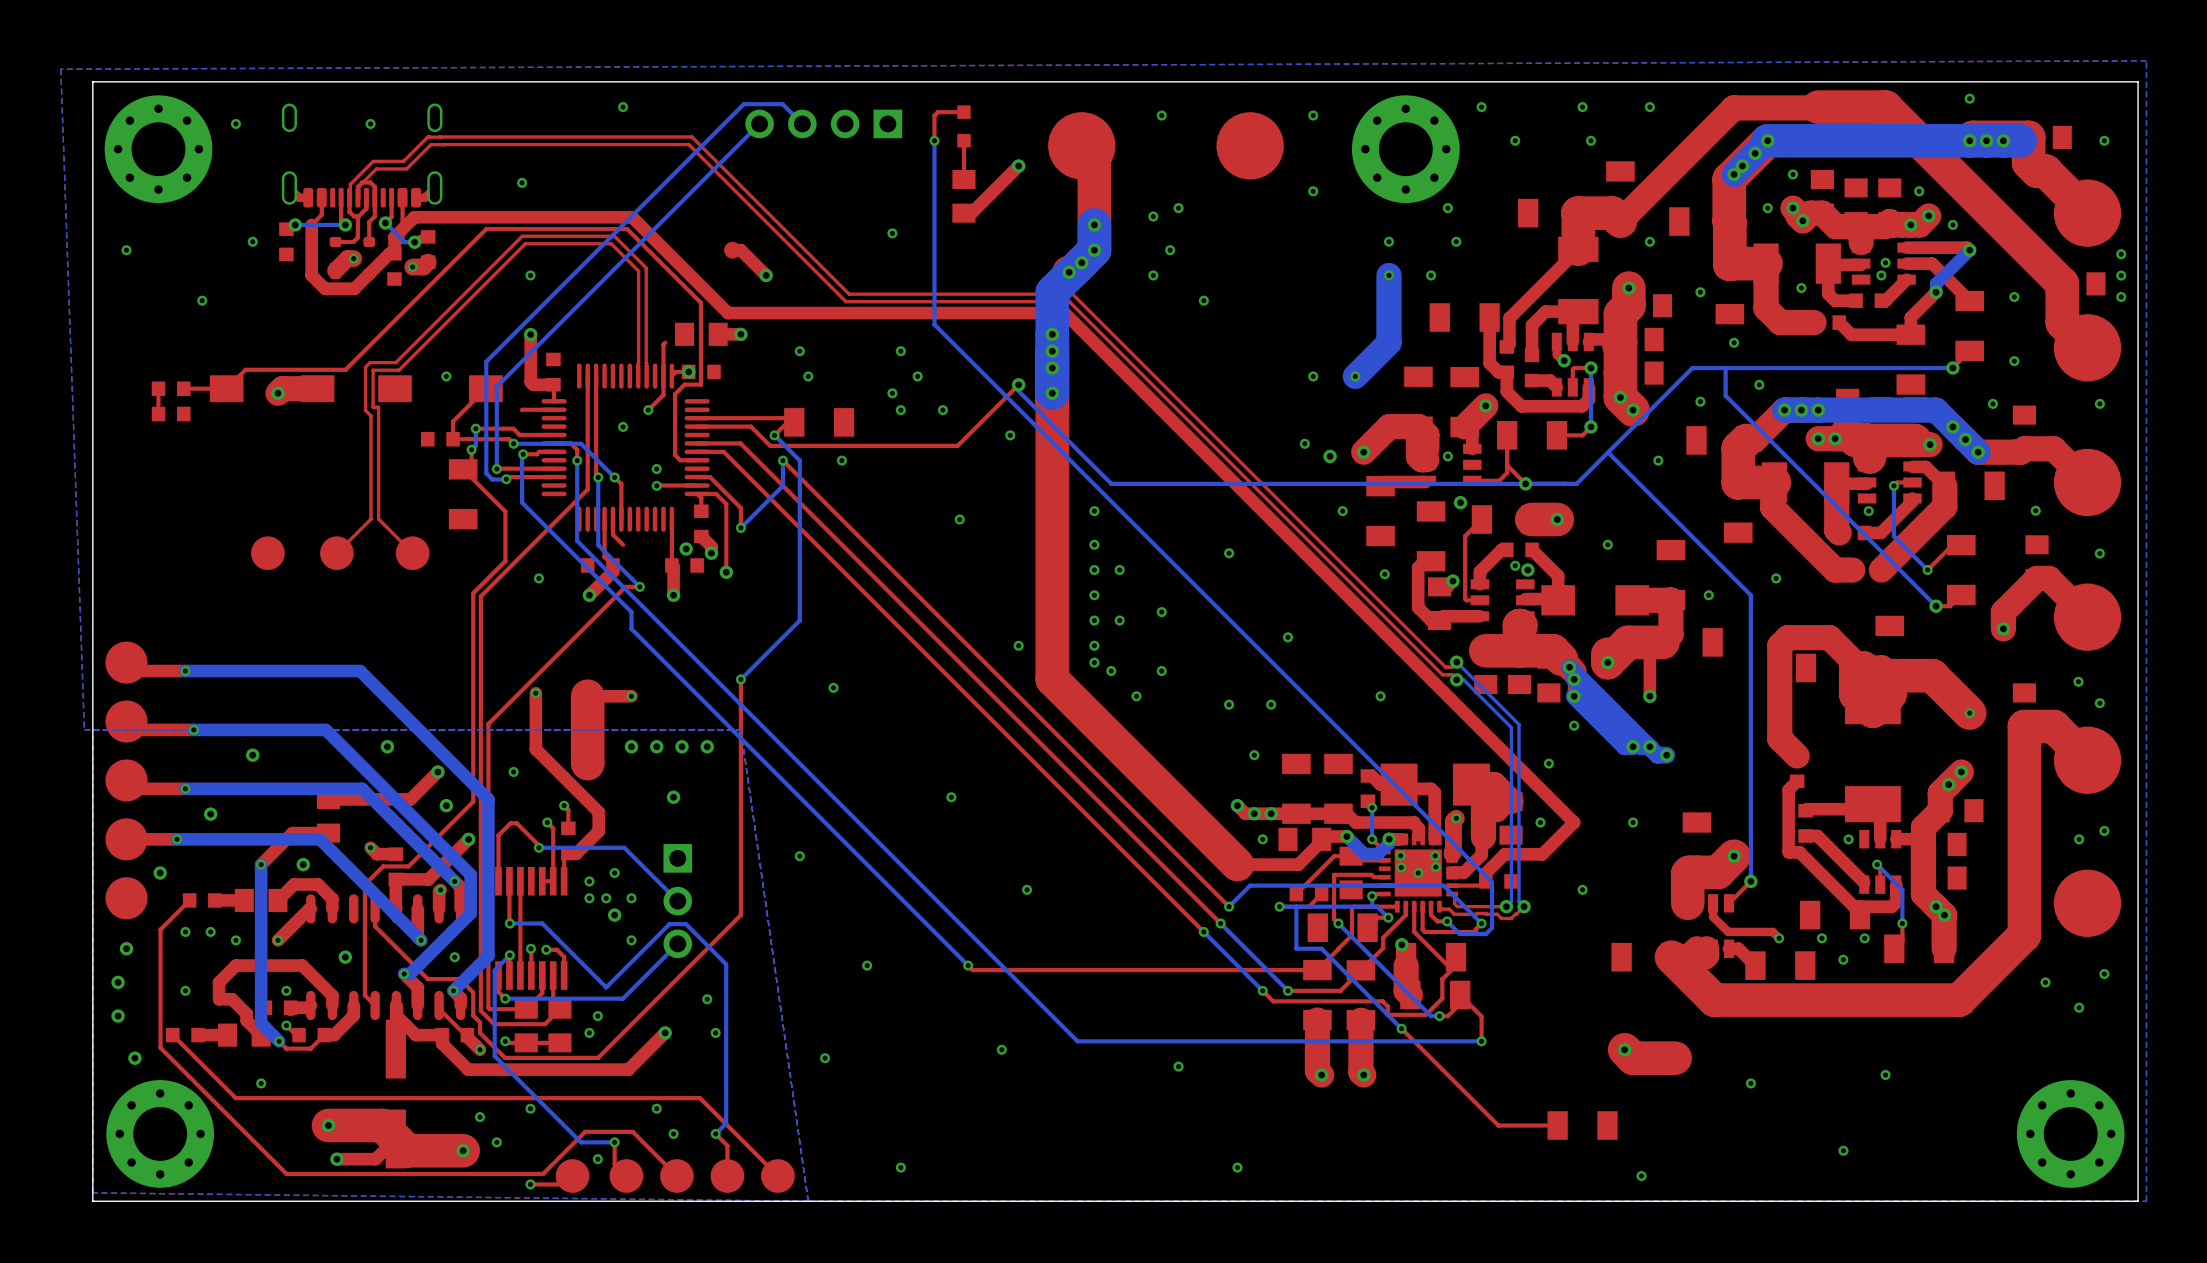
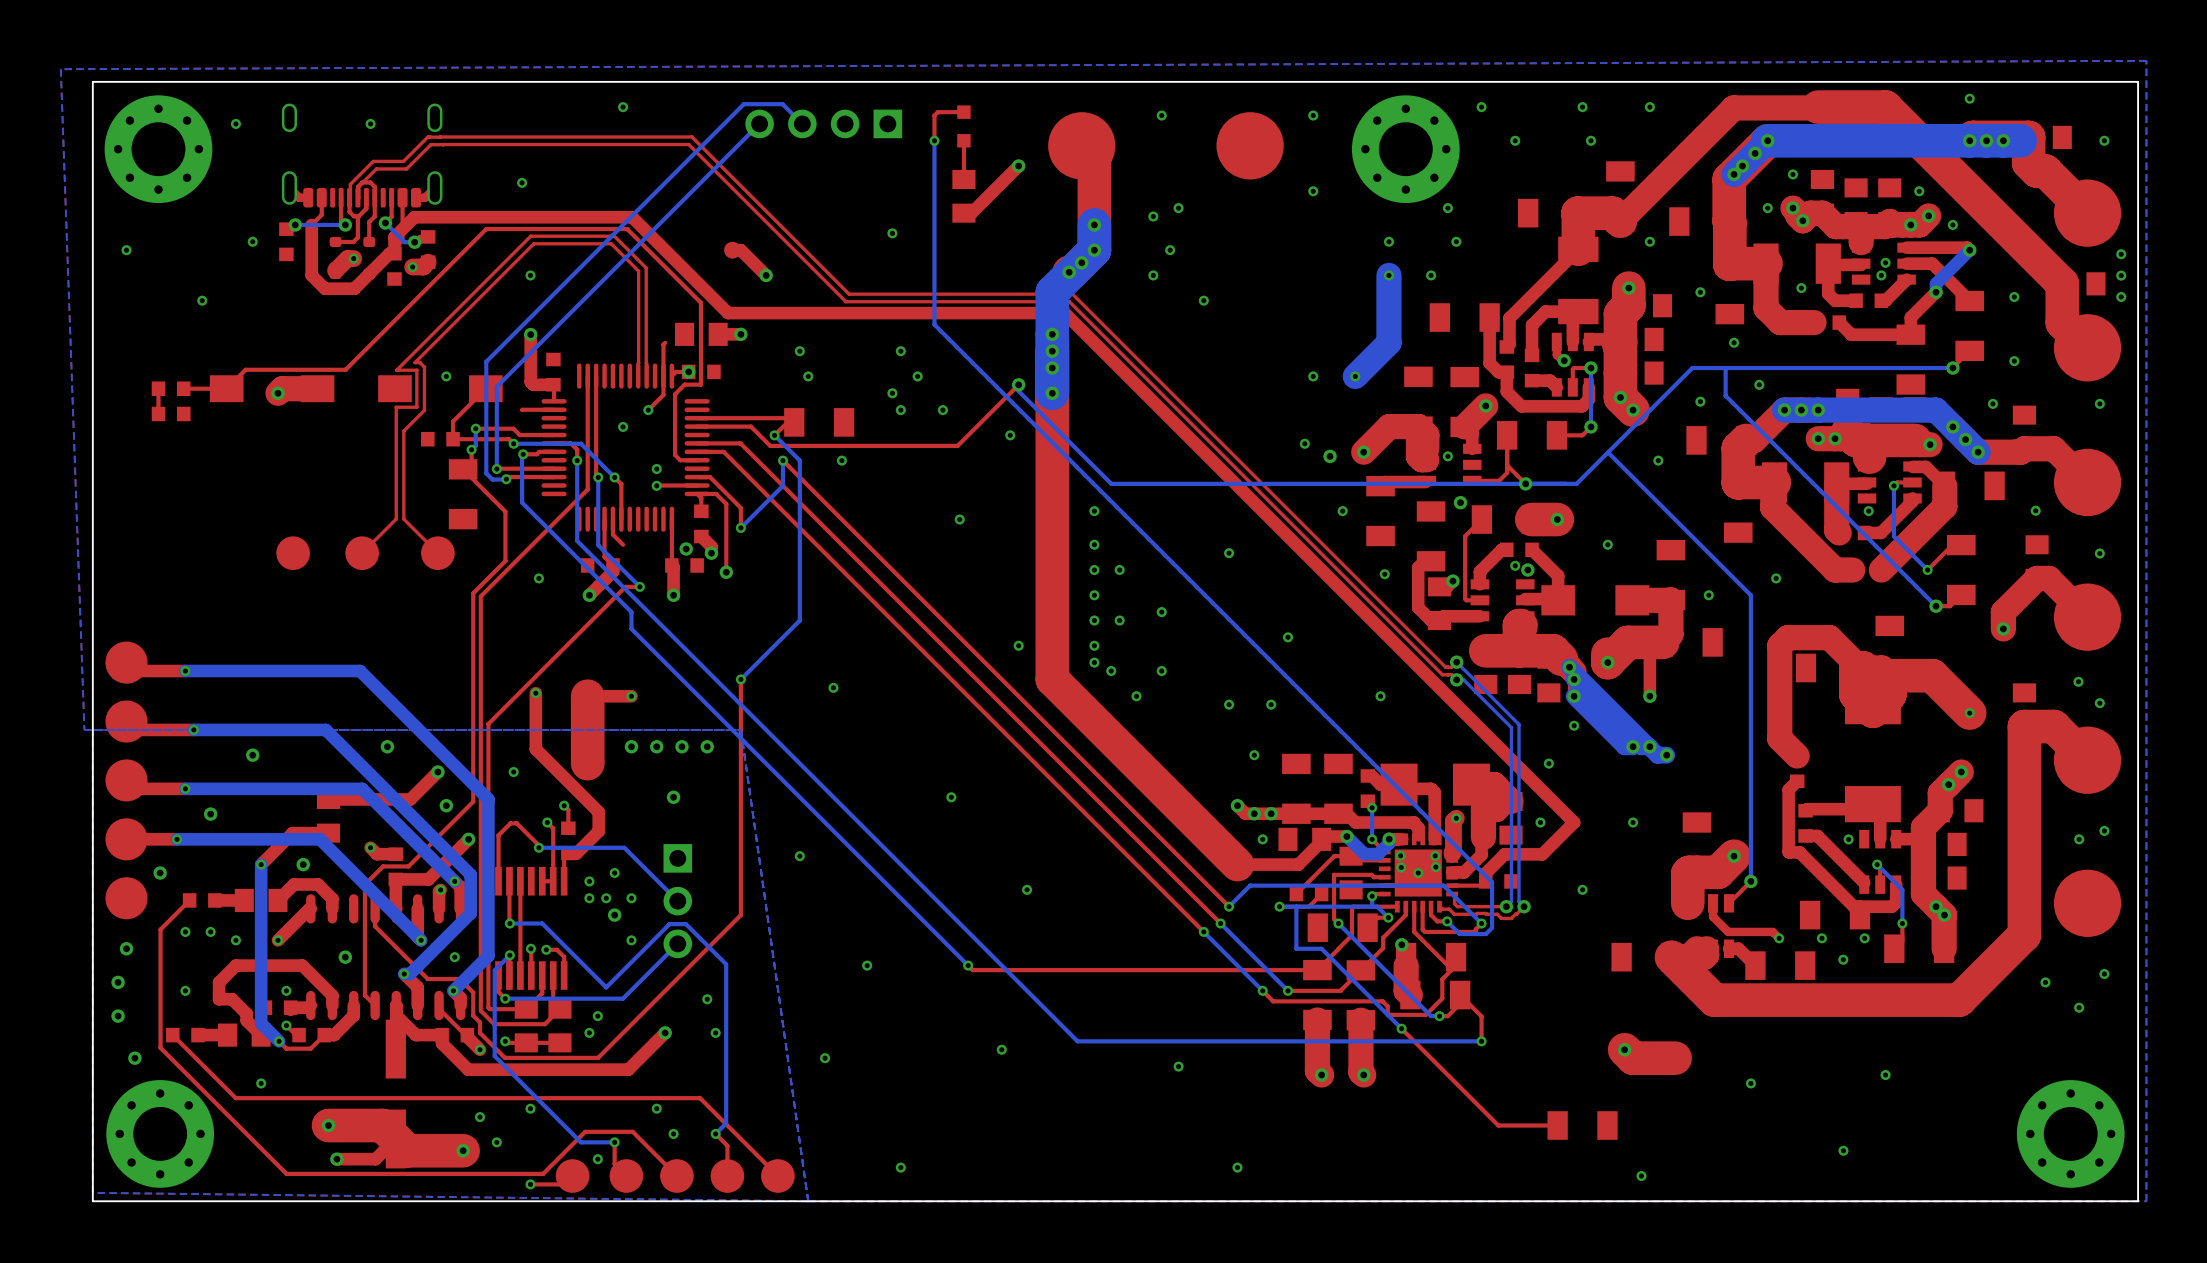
top track: (530, 236) (522, 236) (395, 362) (369, 362) (365, 367) (365, 410) (371, 415) (371, 519) (336, 553) -> (530, 236) (396, 370)
top track: (533, 243) (525, 243) (398, 370) -> (533, 243) (414, 362) (420, 362) (424, 367) (424, 410) (403, 431) (403, 519) (437, 553)
top track: (396, 370) (373, 370) (373, 407) (378, 407) (378, 519) (412, 553) -> none
top track: none -> (398, 370) (416, 370) (416, 407) (396, 407) (396, 519) (362, 553)
part: (267, 553) -> none
part: none -> (293, 553)
part: (336, 553) -> none
part: none -> (362, 553)
part: (412, 553) -> none
part: none -> (437, 553)

